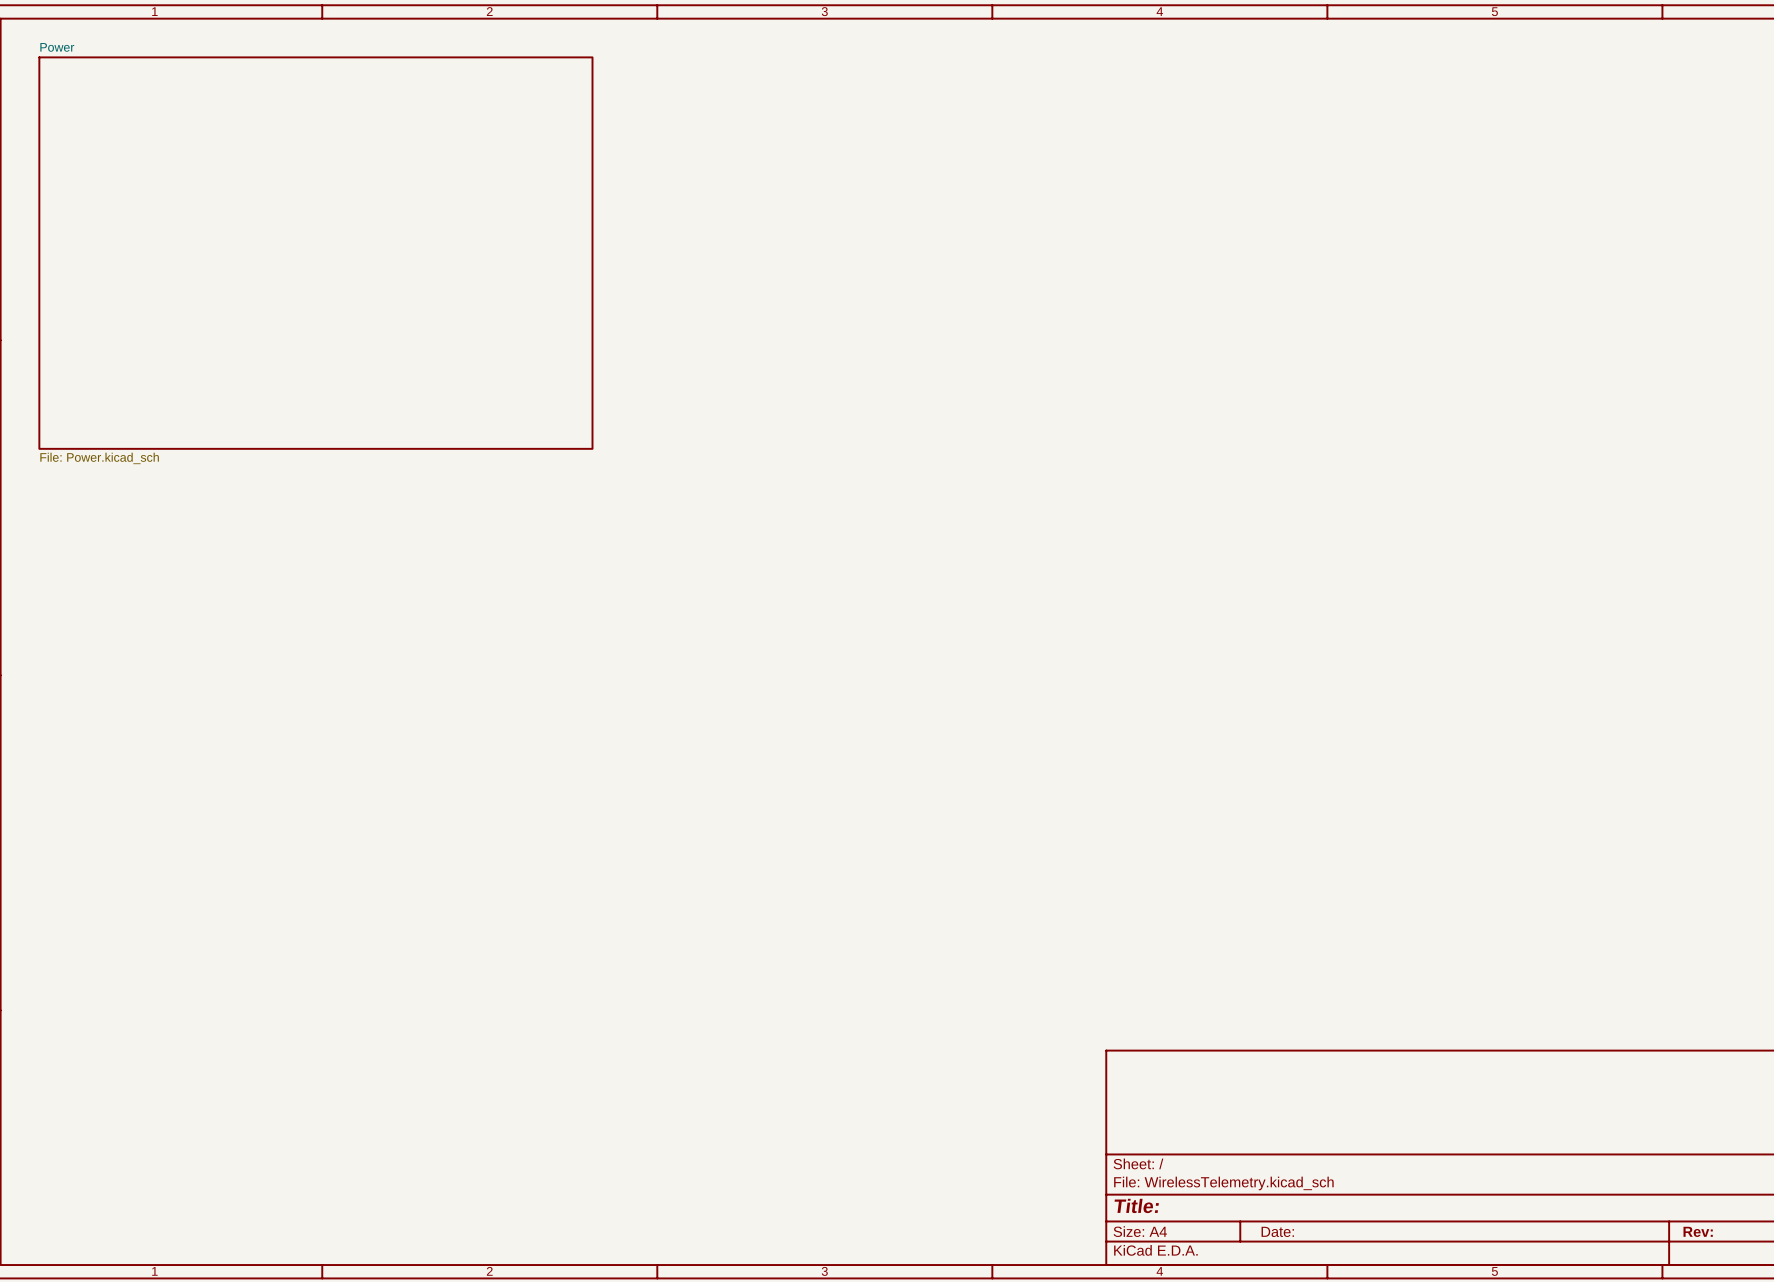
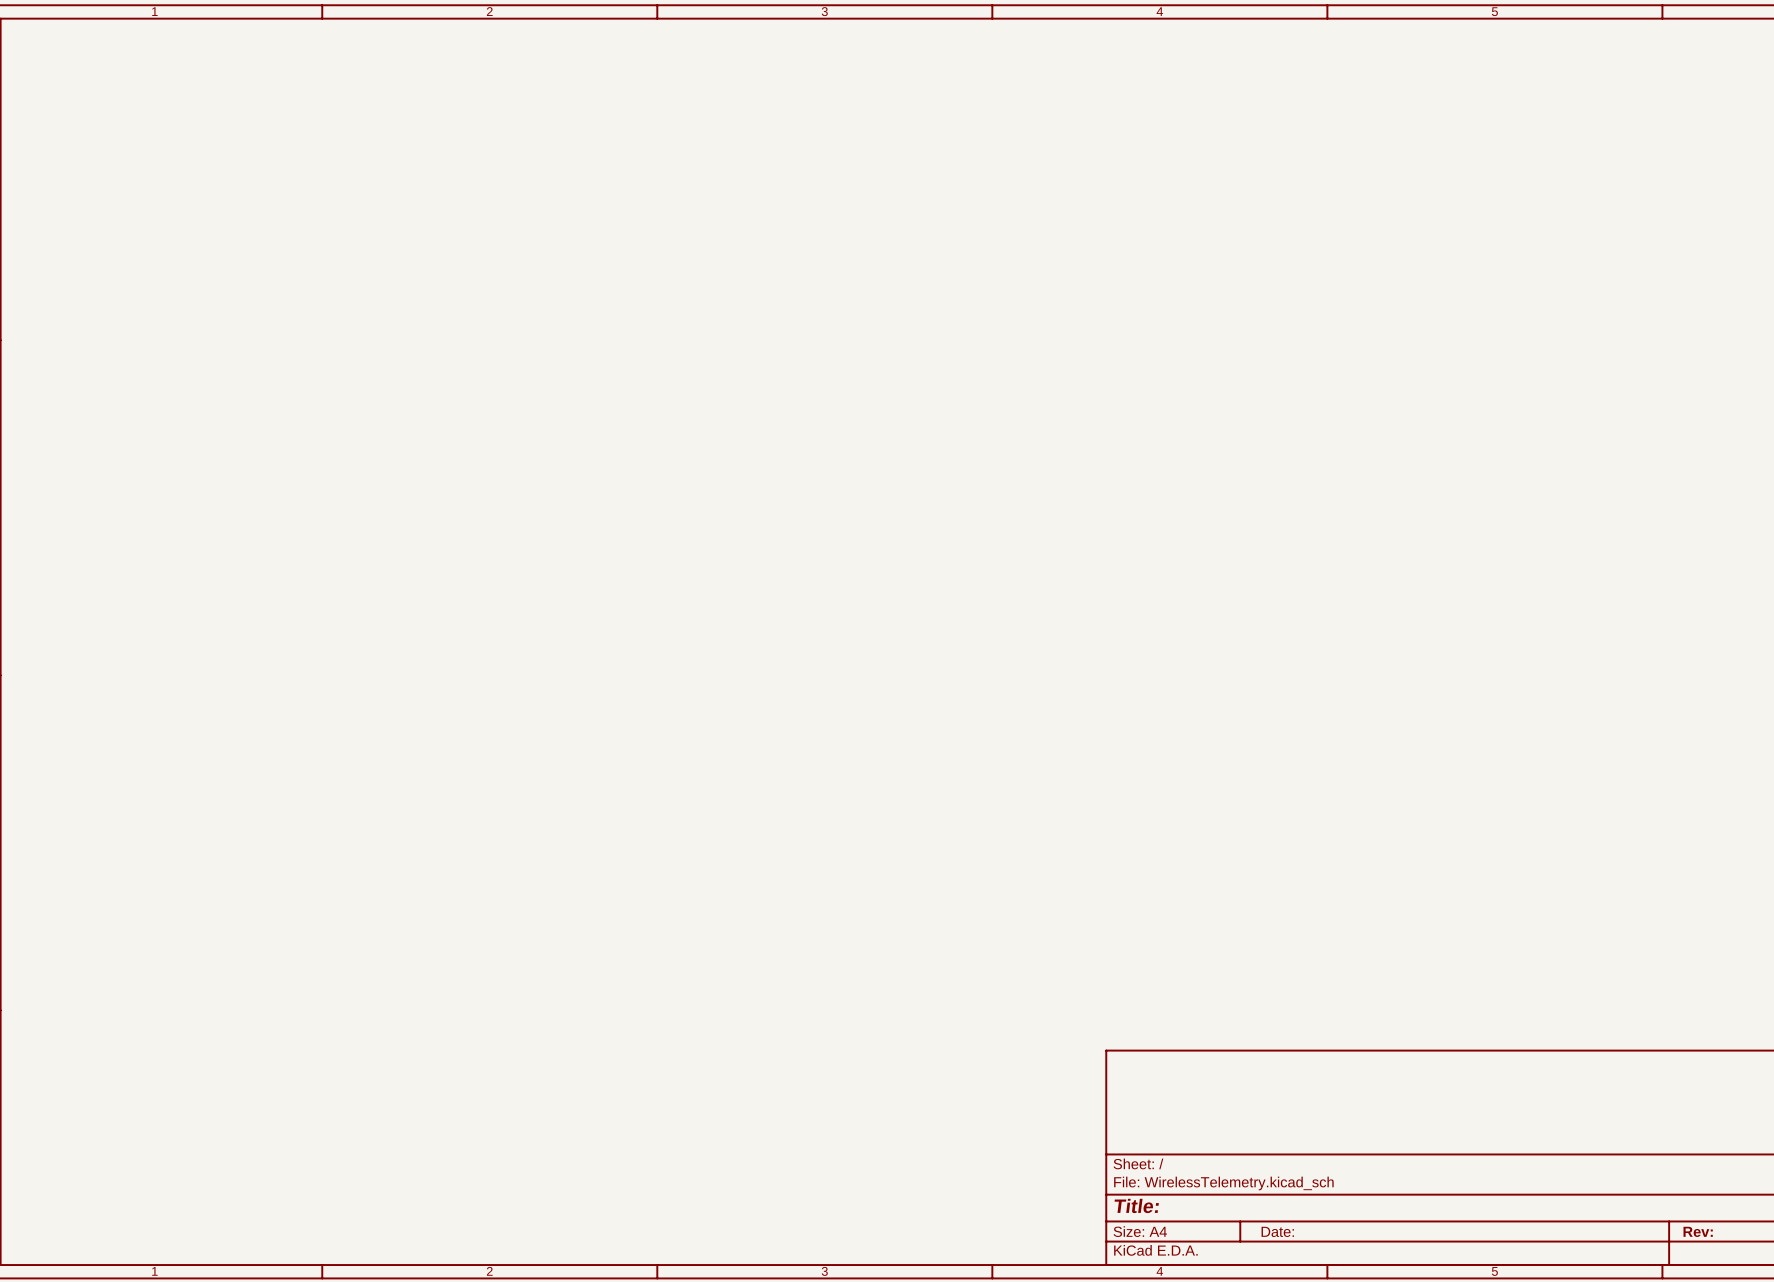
sheet Power: File: Power.kicad_sch (315, 253) -> none

